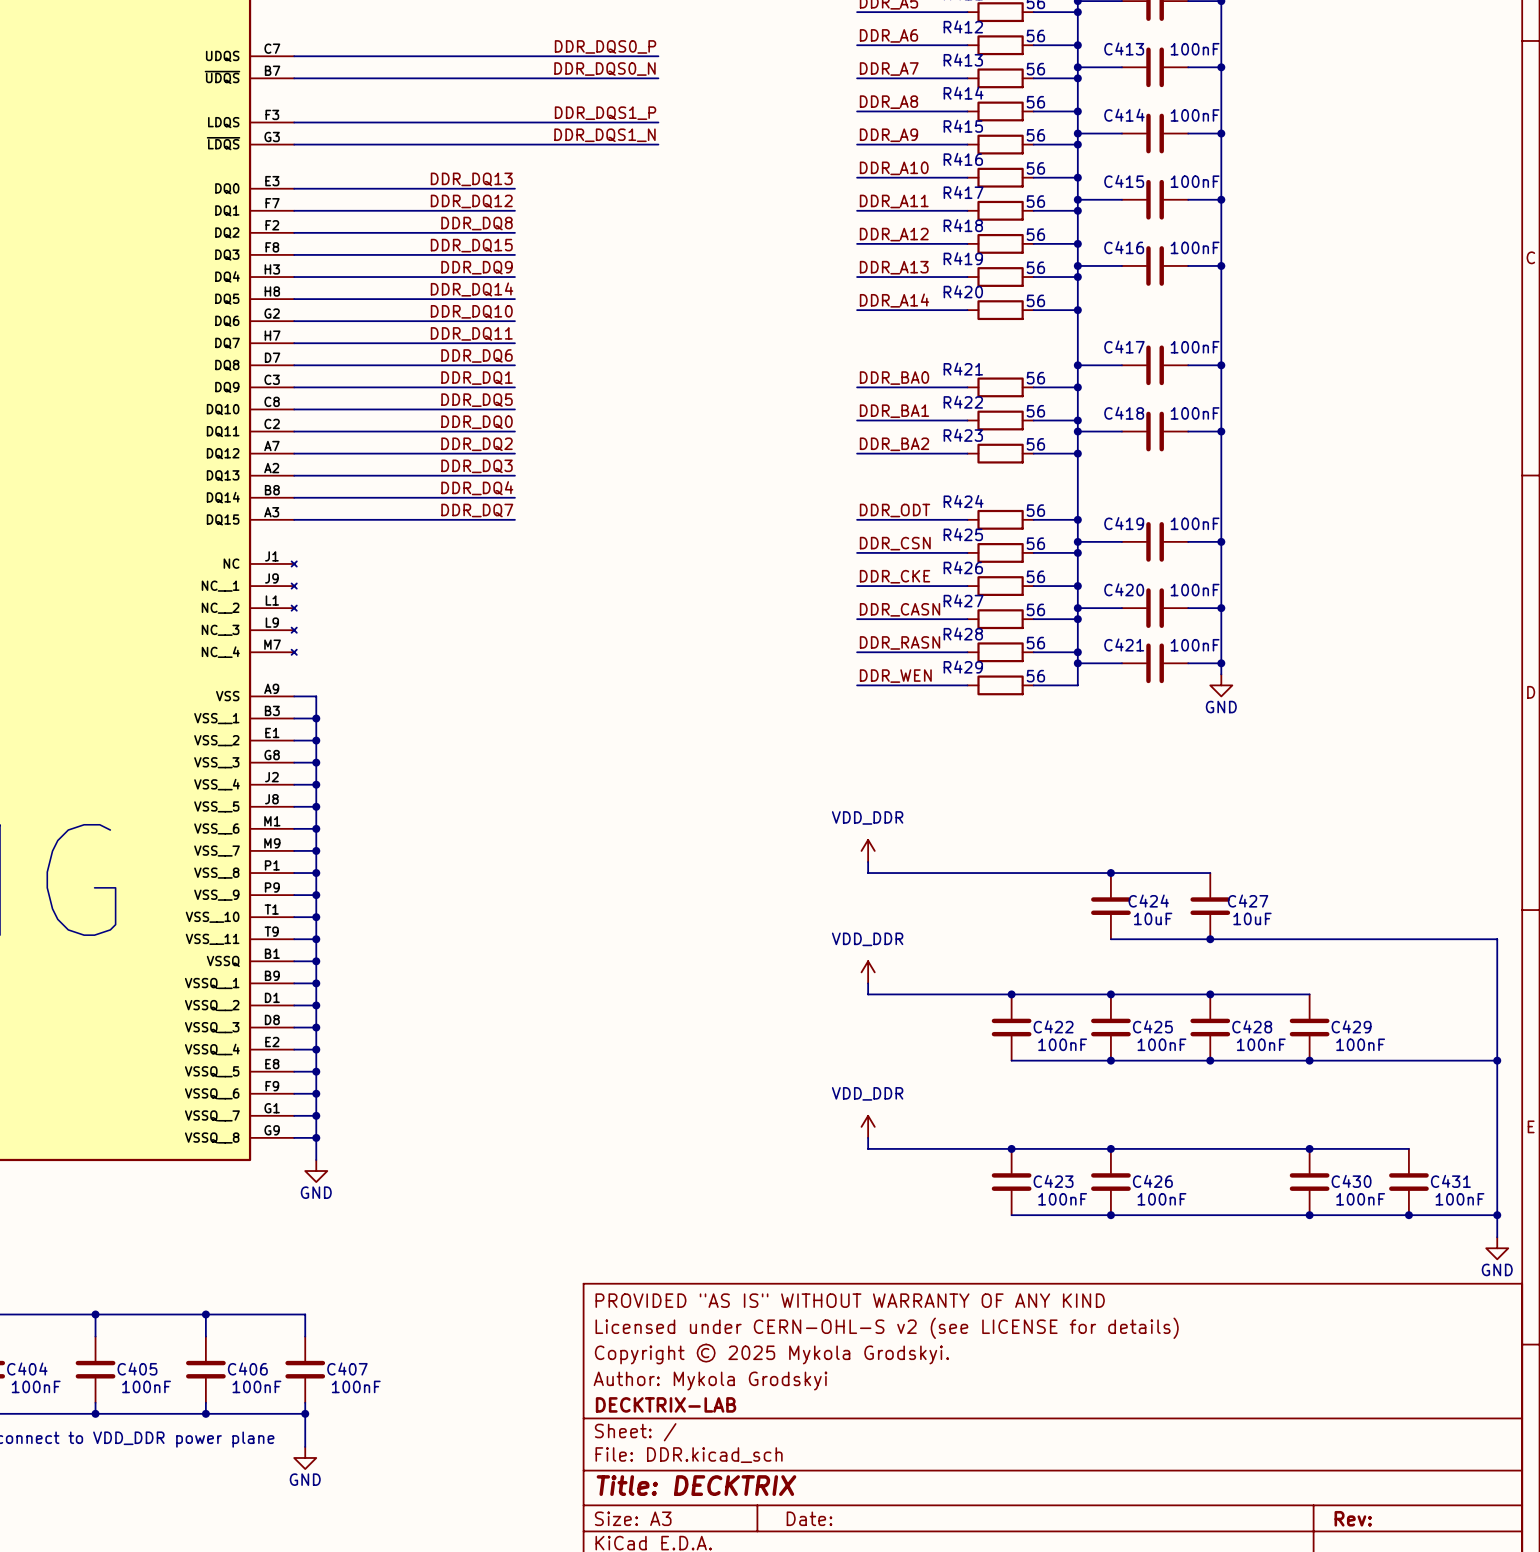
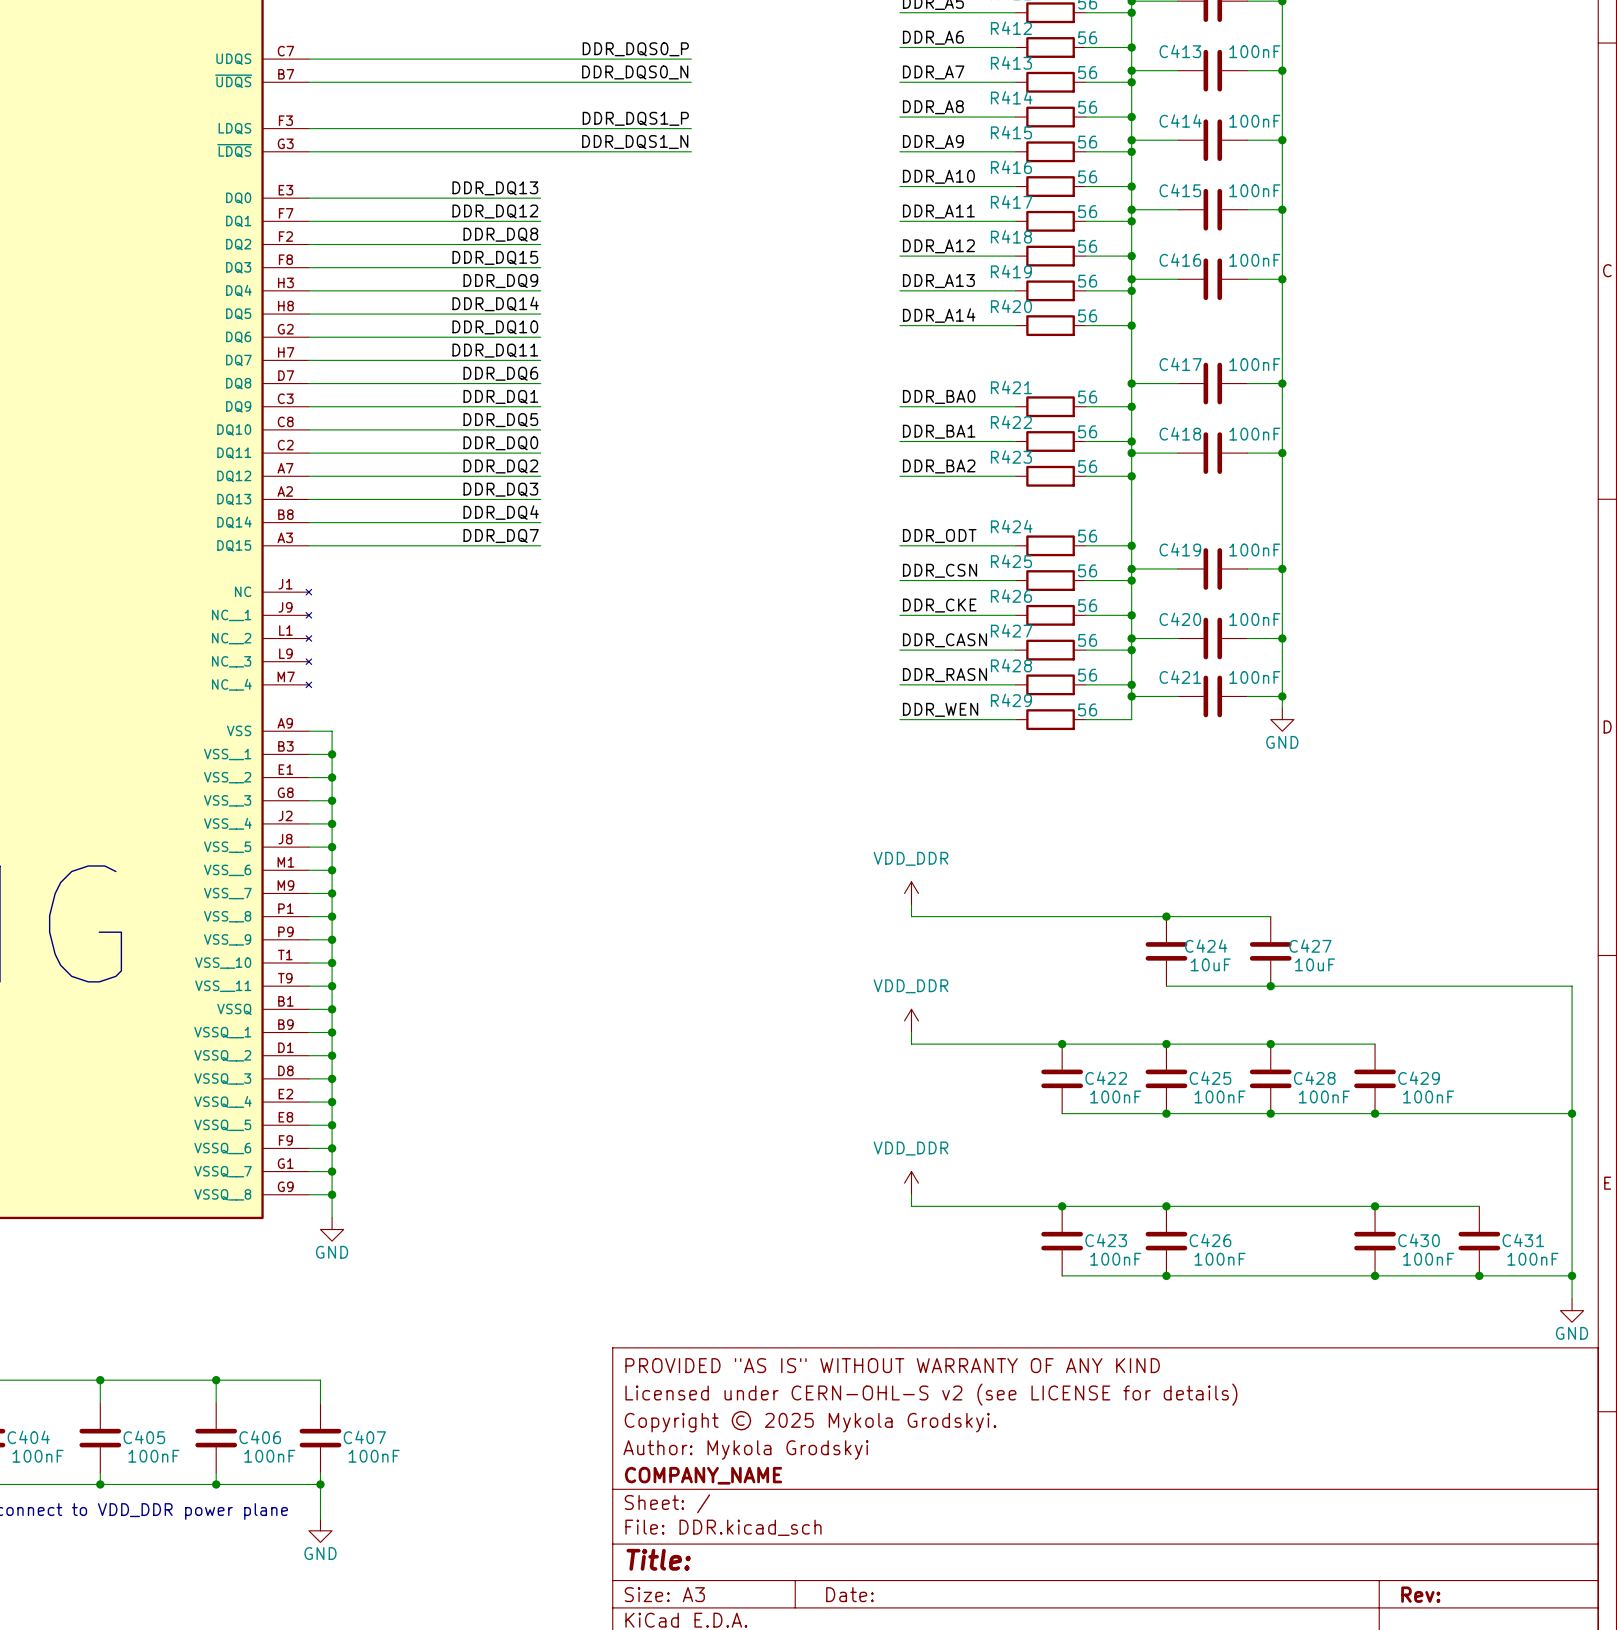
title block: DECKTRIX-LAB (666, 1404) -> COMPANY_NAME (703, 1475)
title block: Title: DECKTRIX (696, 1485) -> Title: (658, 1559)

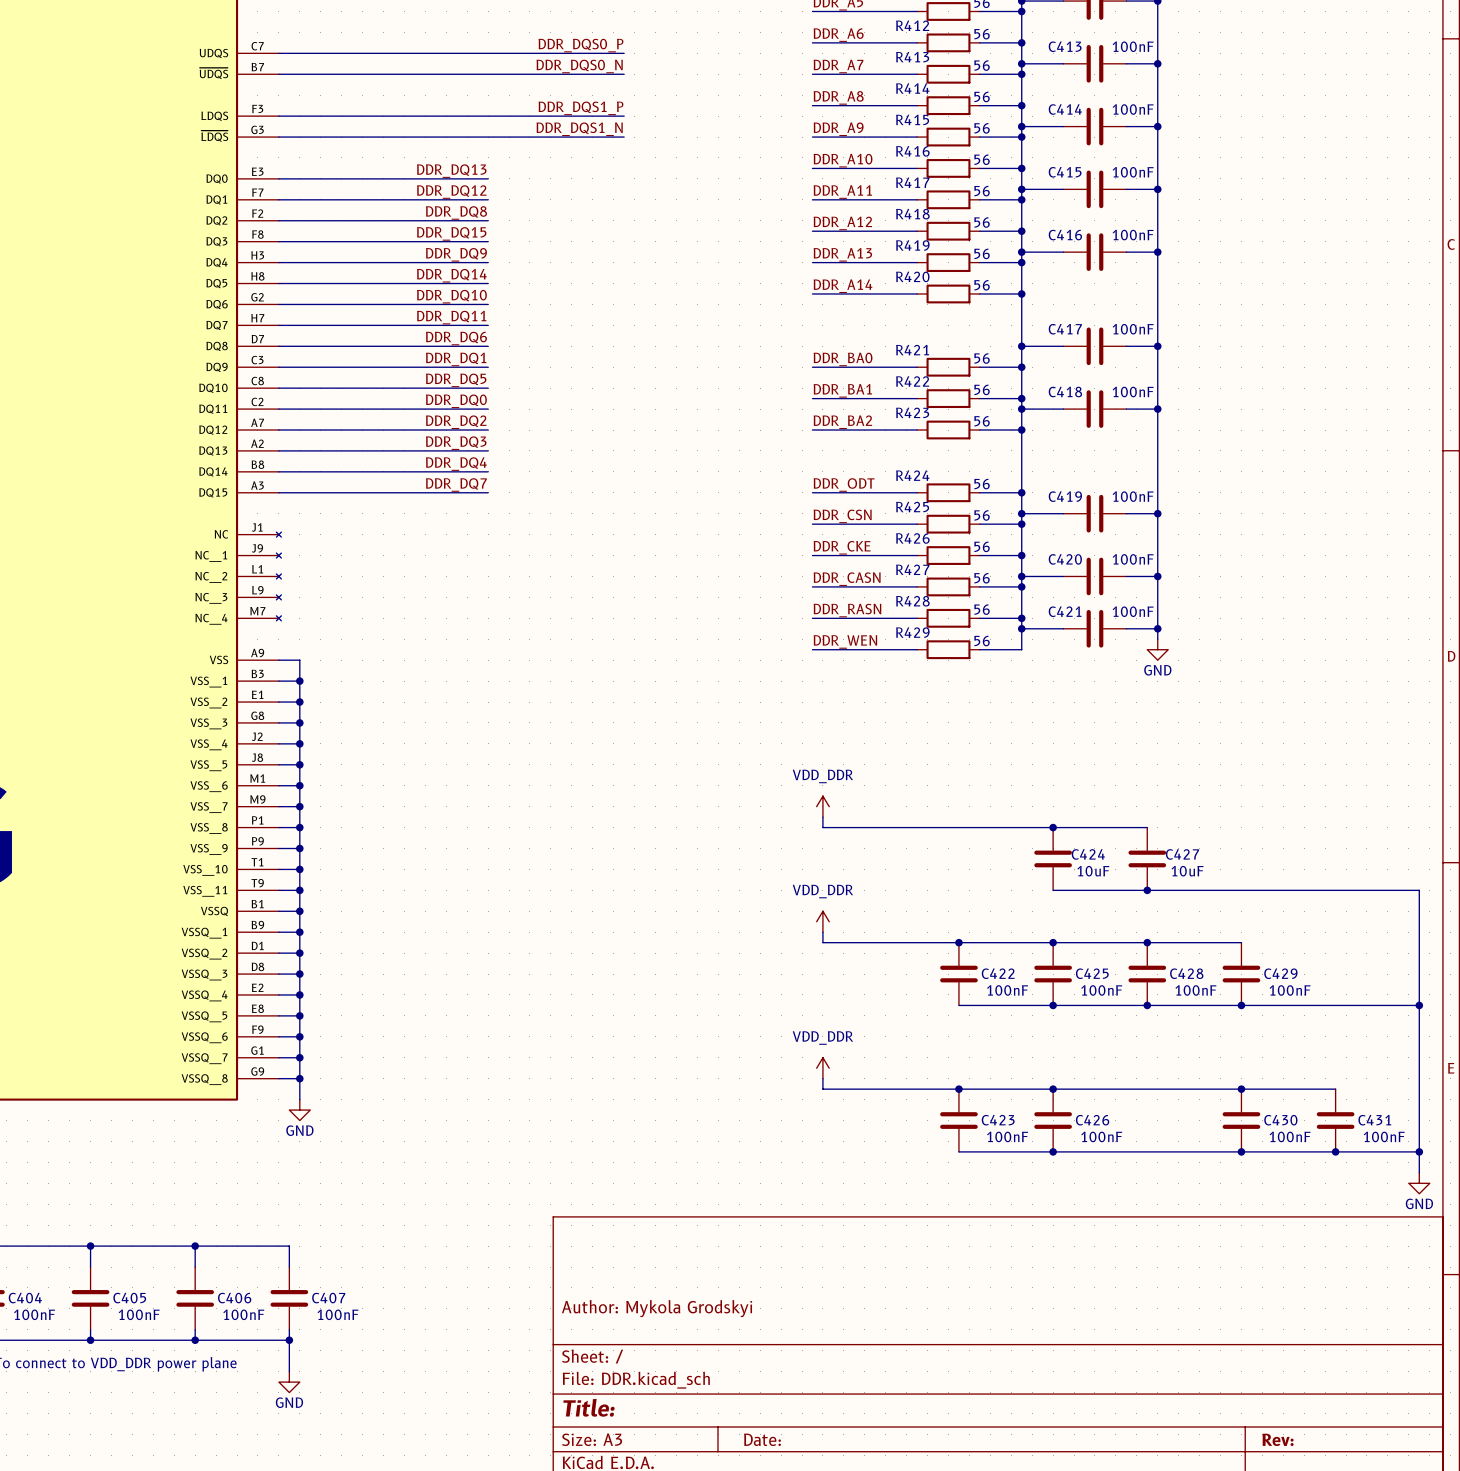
title block: PROVIDED "AS IS" WITHOUT WARRANTY OF ANY KIND (892, 1365) -> none
title block: Licensed under CERN-OHL-S v2 (see LICENSE for details) (931, 1394) -> none
title block: Copyright © 2025 Mykola Grodskyi. (810, 1421) -> none
title block: COMPANY_NAME (703, 1475) -> none

